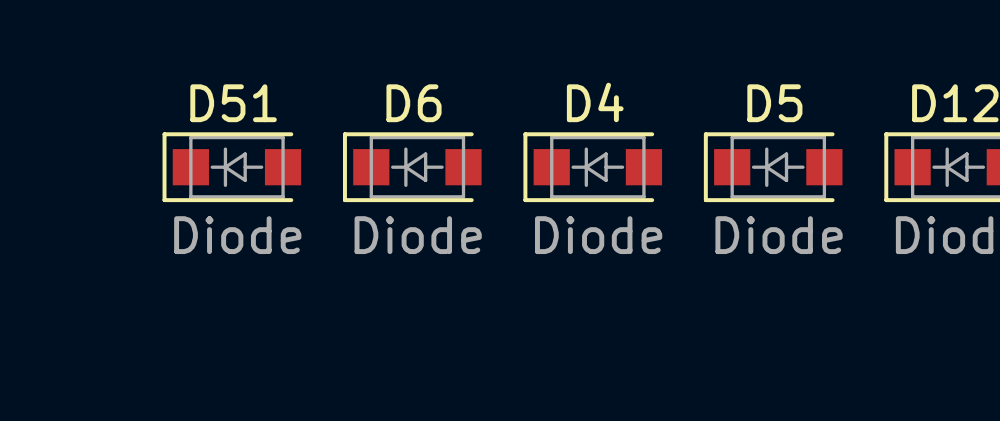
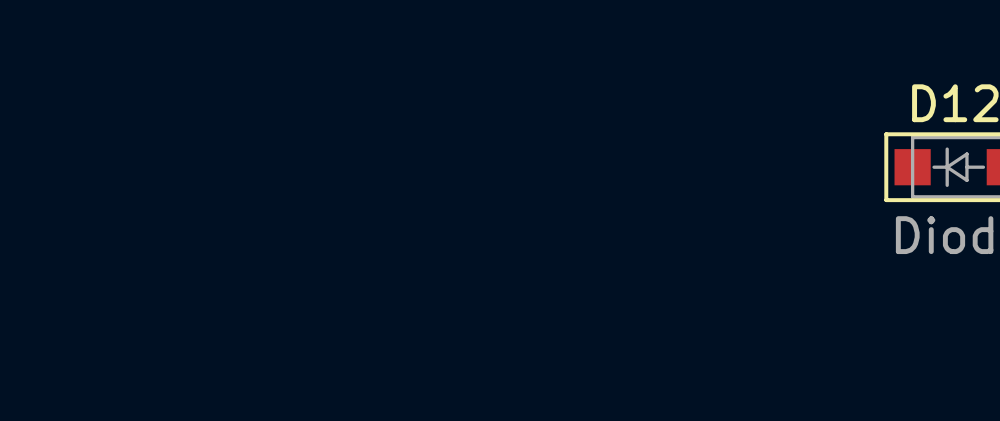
D51: Diode (231, 167) -> none
D6: Diode (412, 167) -> none
D4: Diode (592, 167) -> none
D5: Diode (773, 167) -> none

